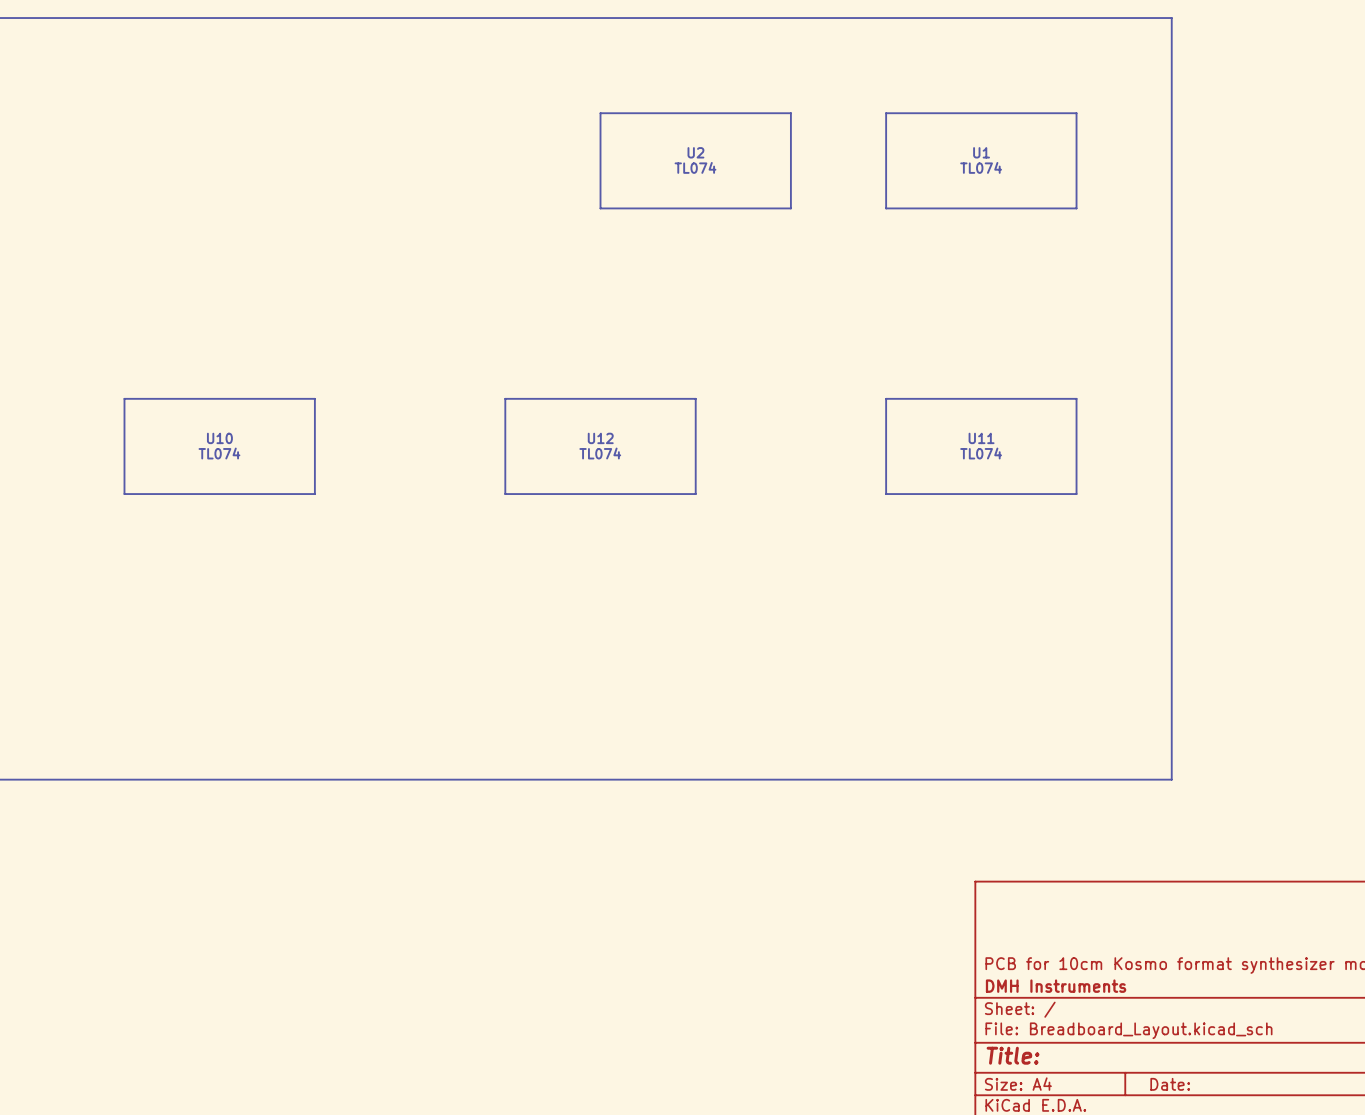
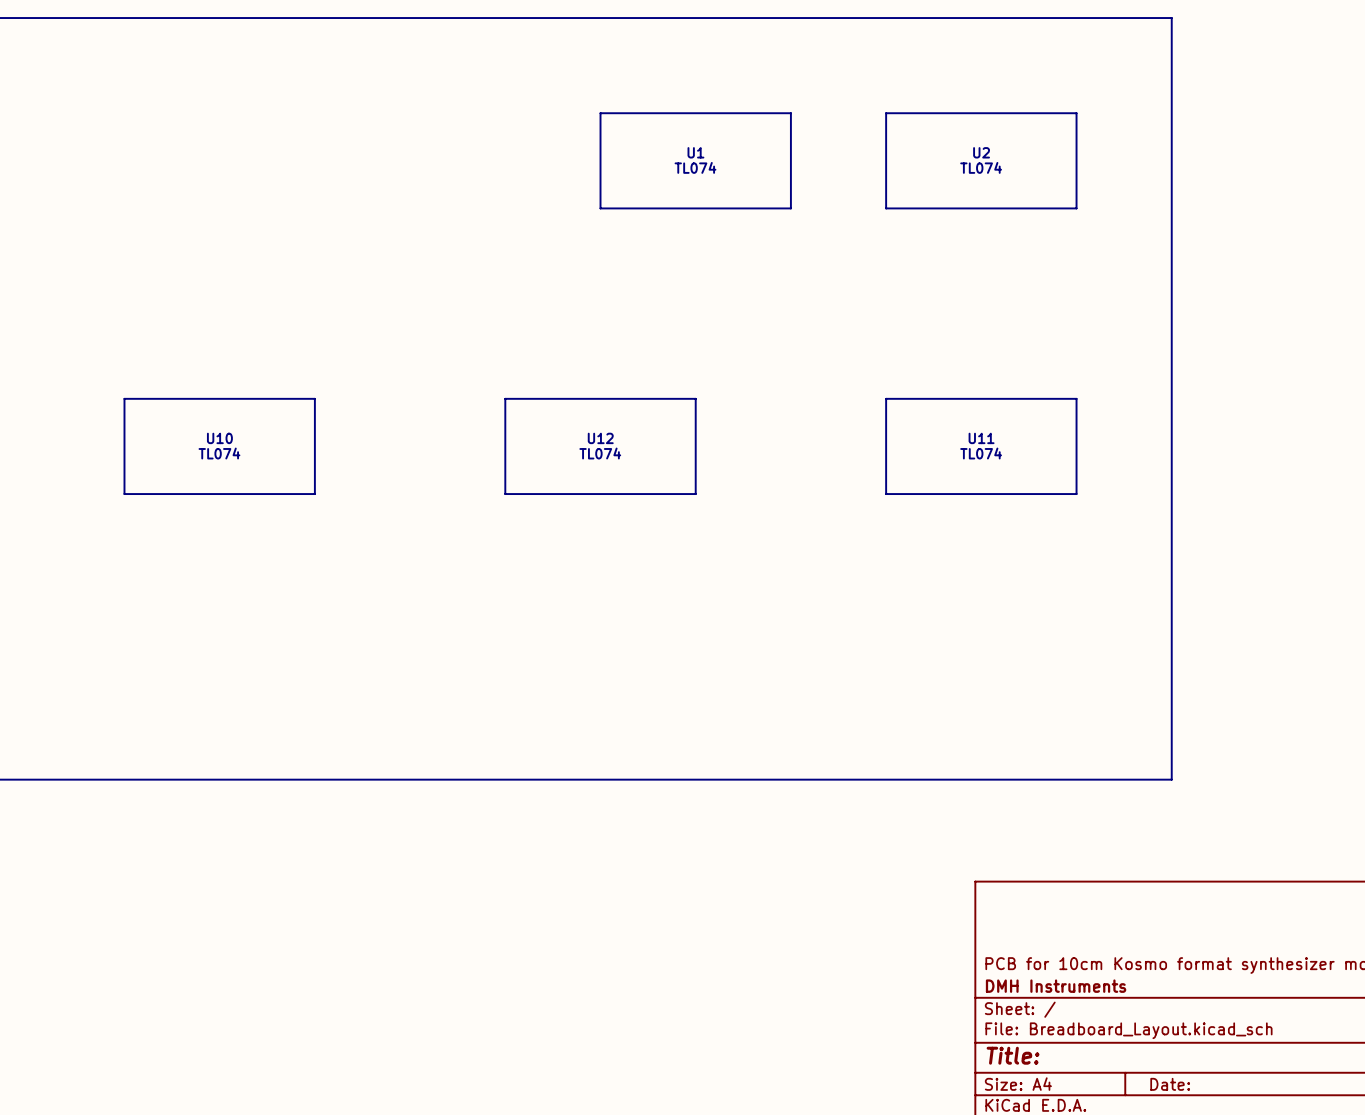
text: U2 (695, 152) -> U1 (695, 152)
text: U1 (981, 152) -> U2 (981, 152)

